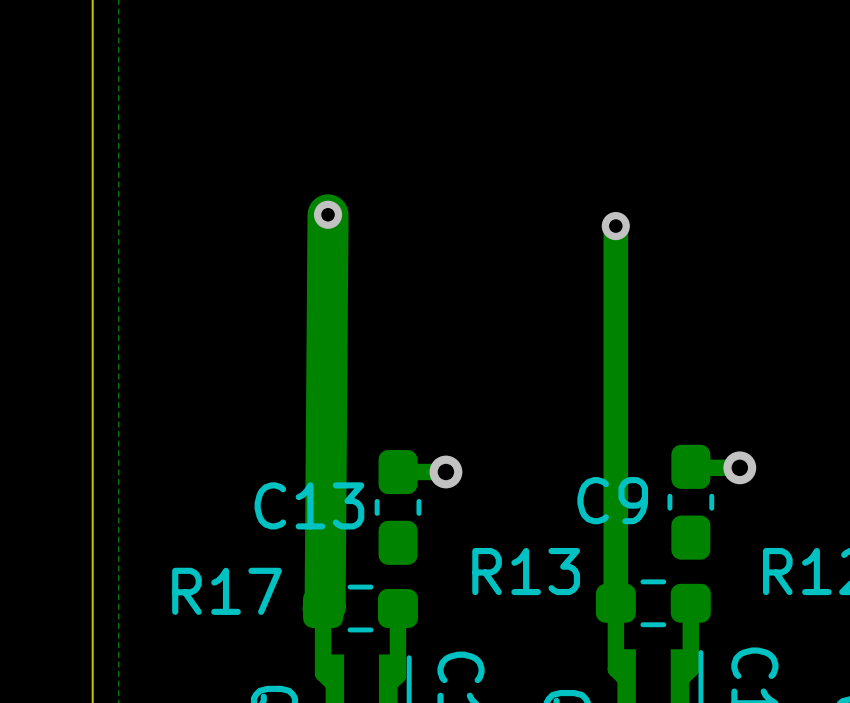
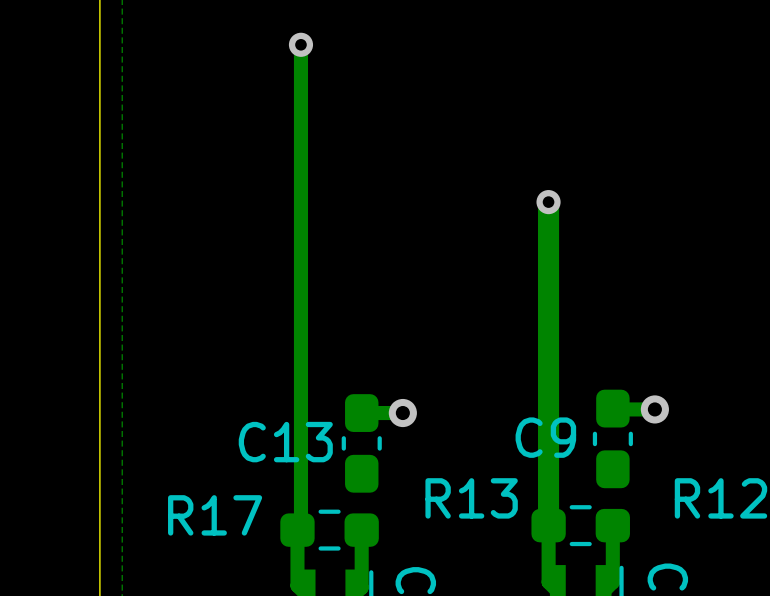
track: (328, 214) (325, 606) -> (300, 44) (300, 526) (299, 528)
via position: (328, 214) -> (300, 44)

